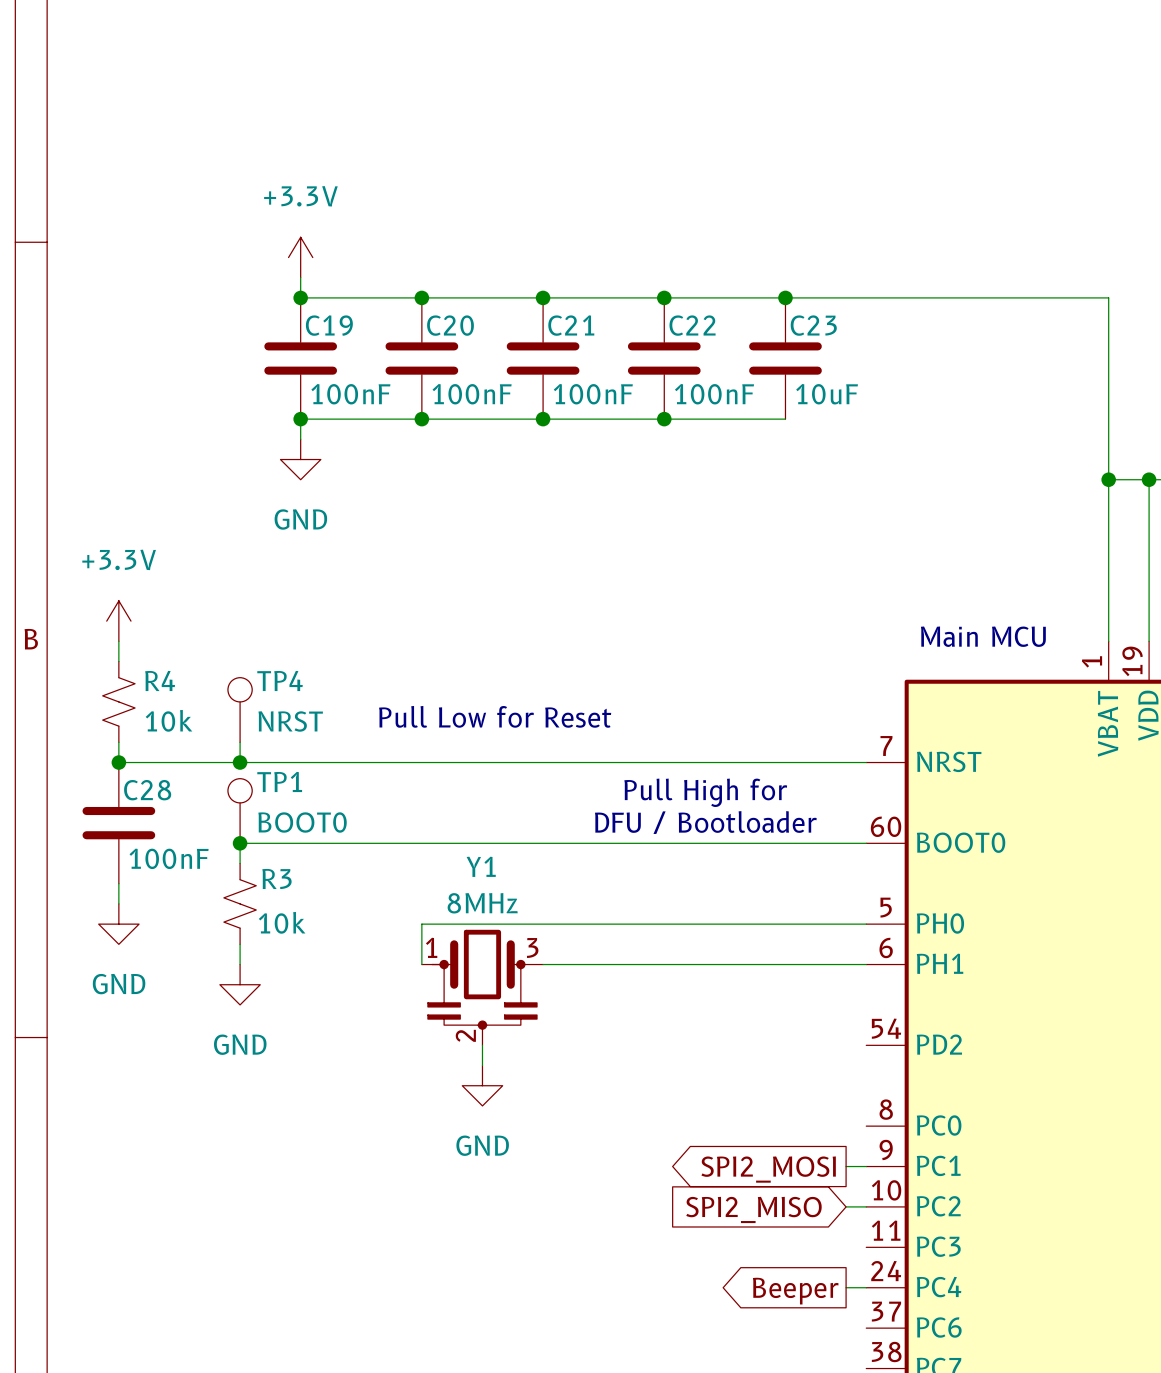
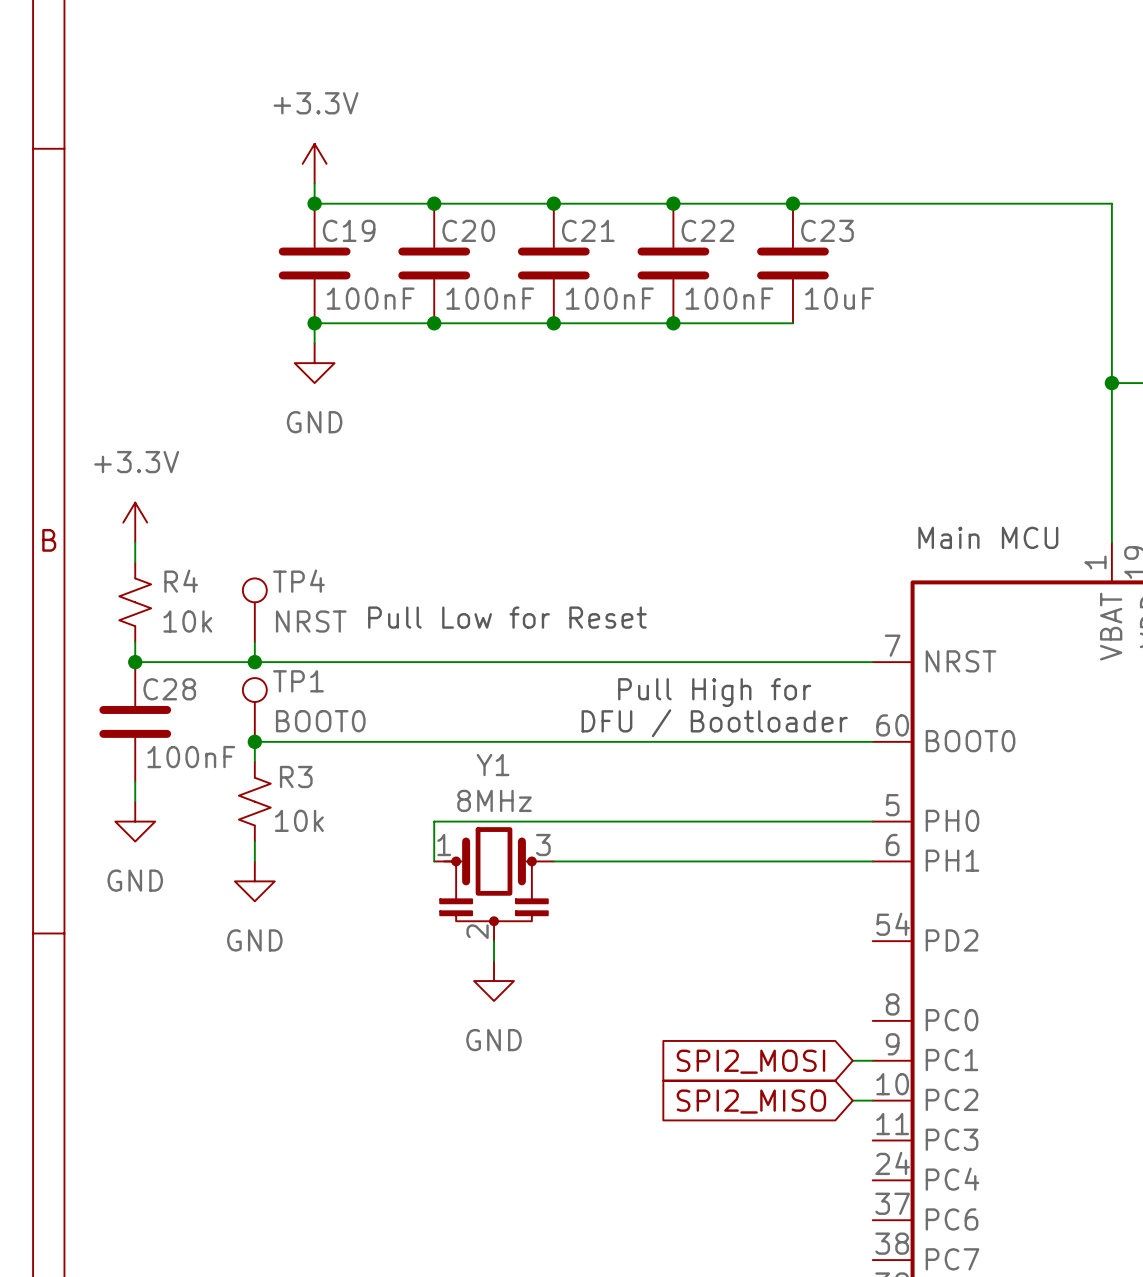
global label shape: output (768, 1169) -> input (750, 1061)
wire: (846, 1287) (866, 1287) -> none
global label: Beeper (795, 1291) -> none

